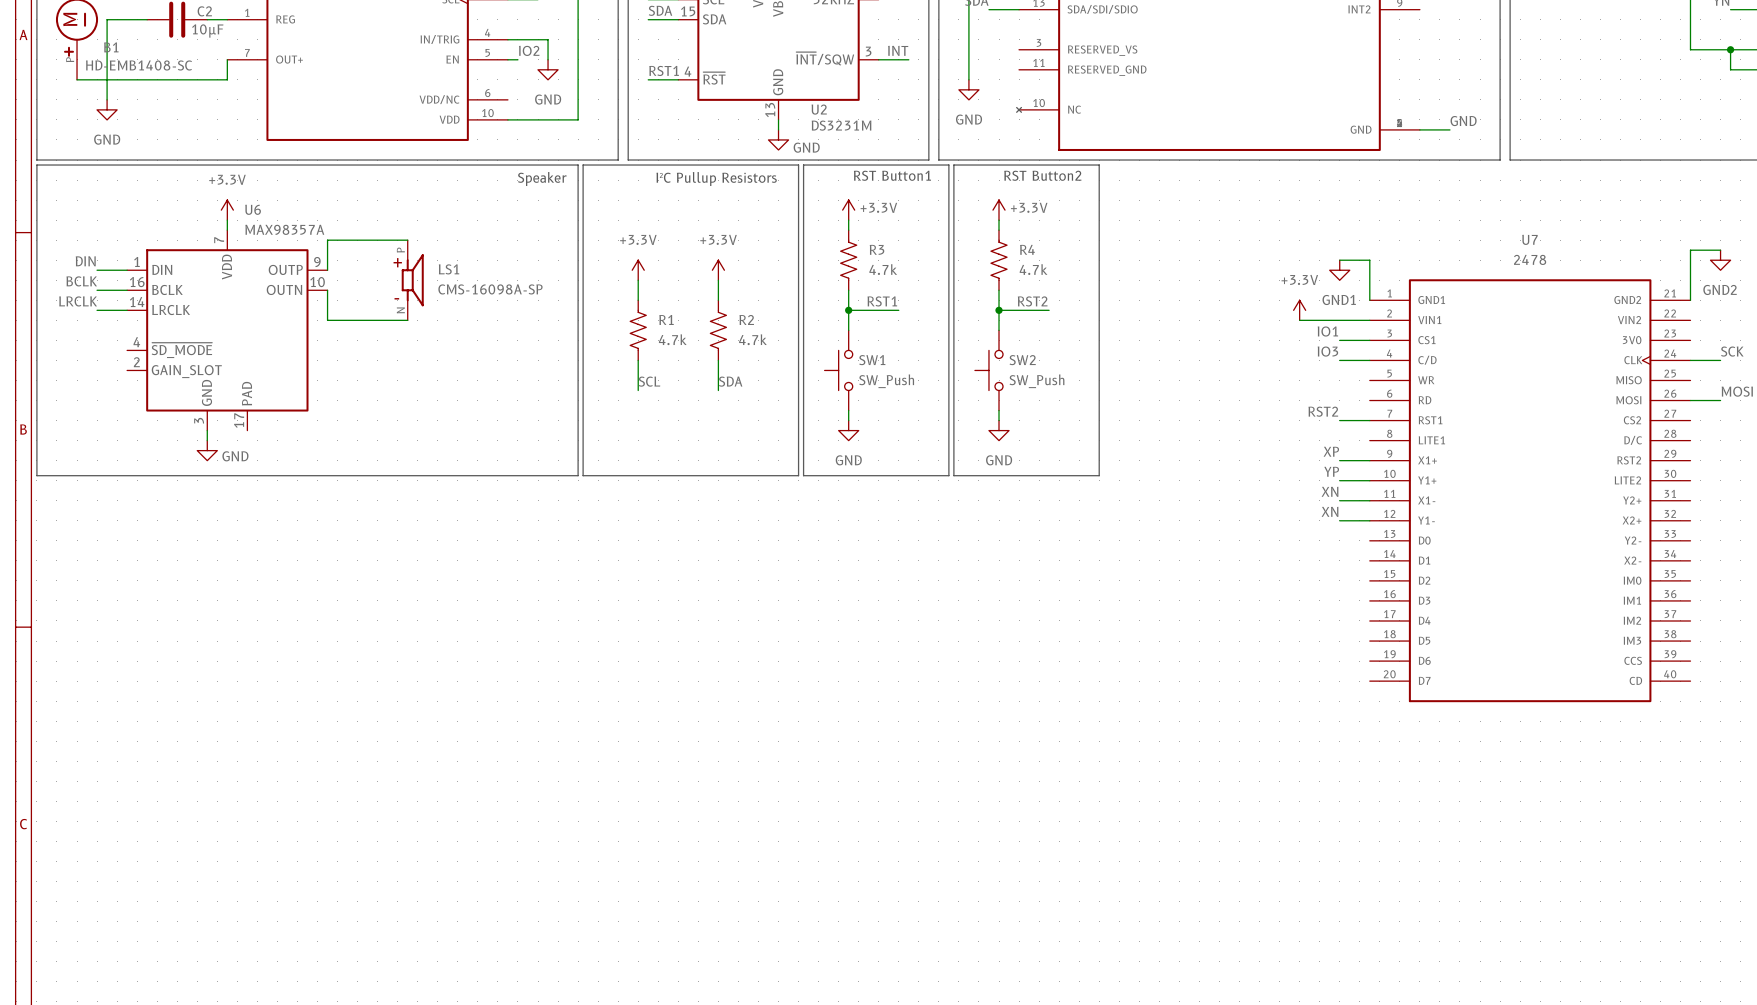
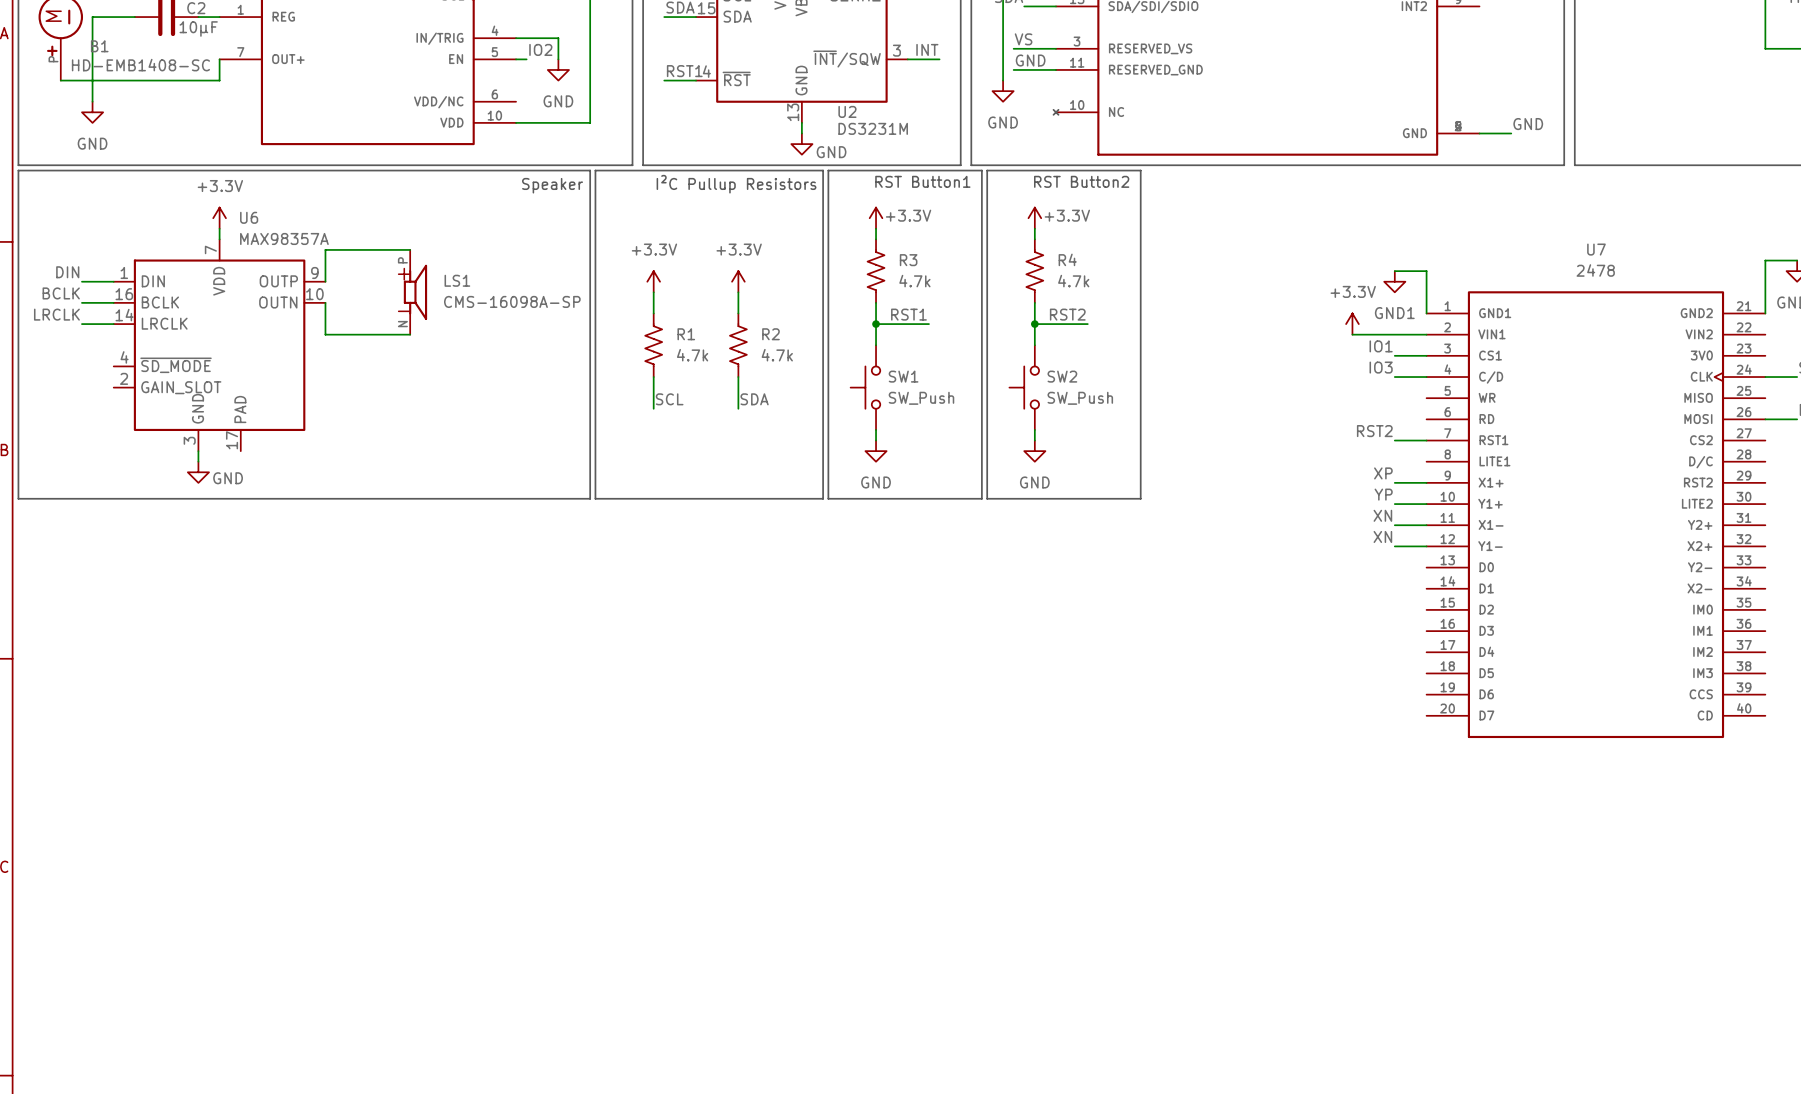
label: none -> VS (1023, 39)
wire: none -> (1013, 48) (1056, 48)
label: none -> GND (1030, 60)
wire: none -> (1013, 69) (1056, 69)

